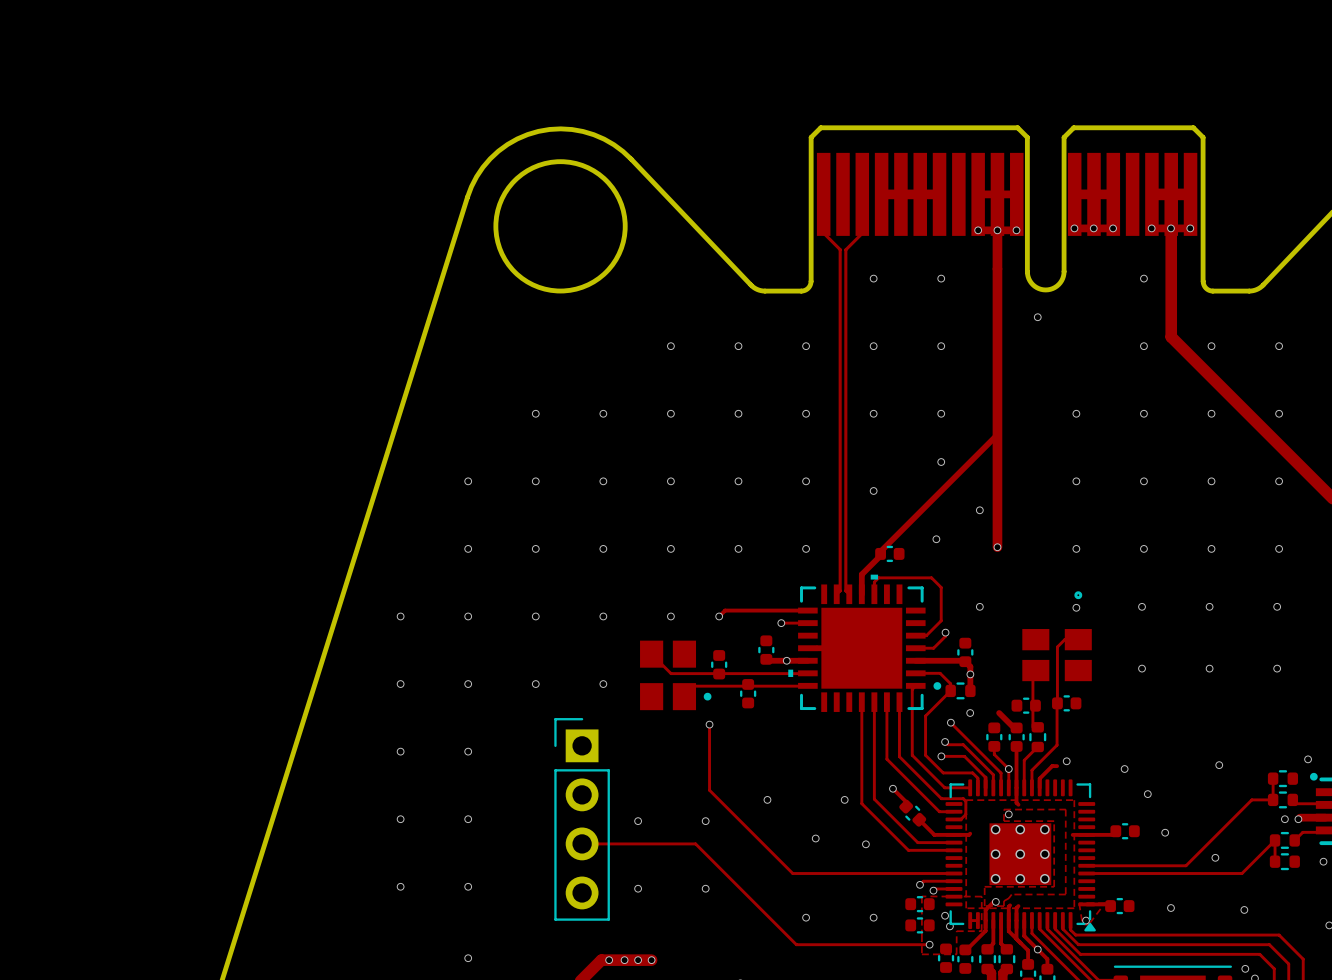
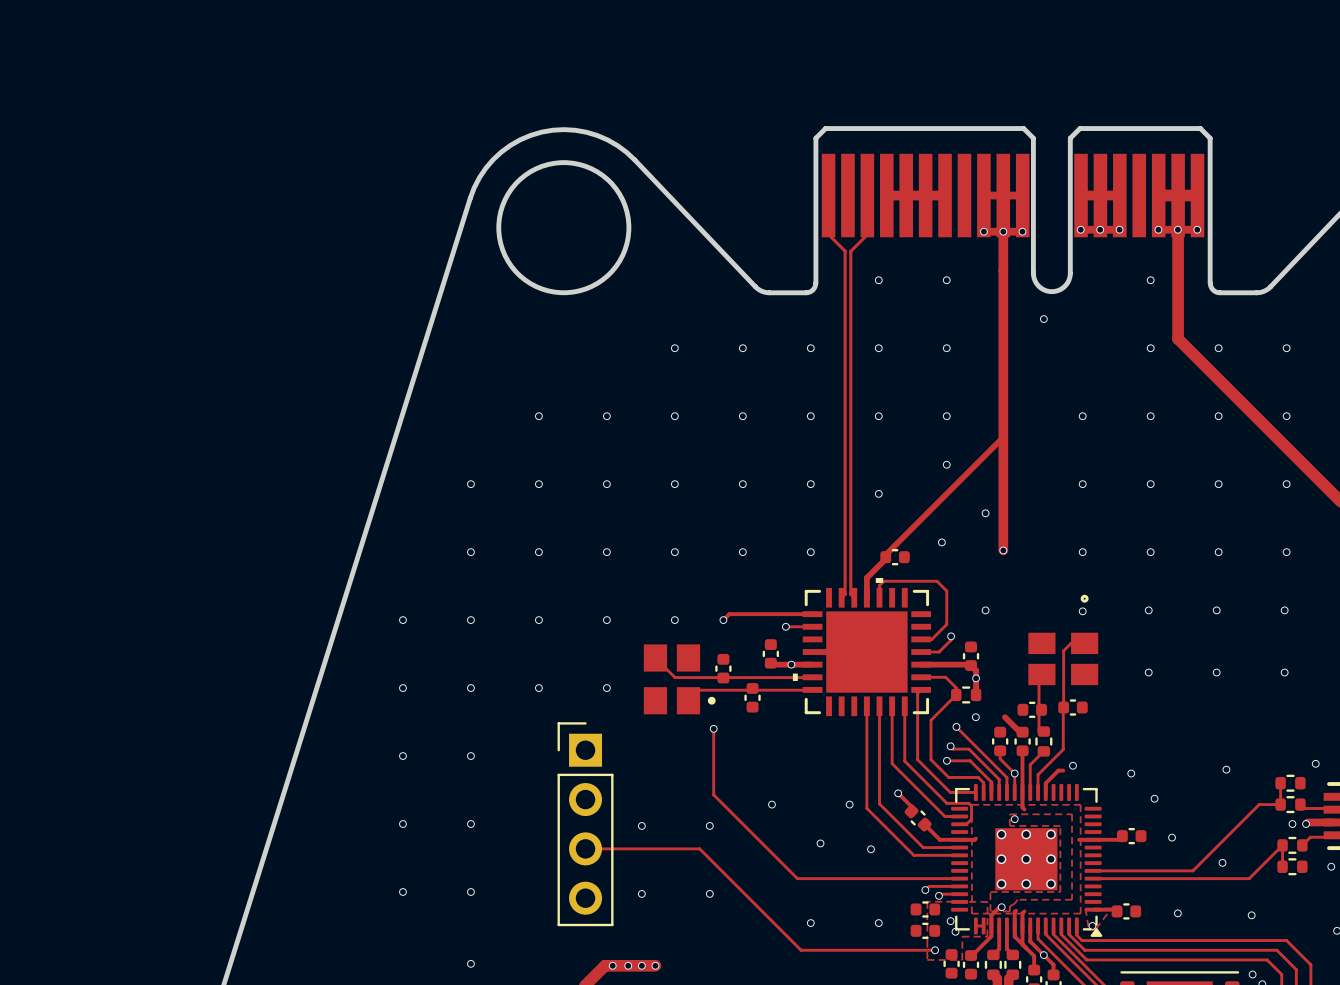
drawing: [933, 682, 942, 690] -> none
drawing: [1309, 772, 1318, 781] -> none

